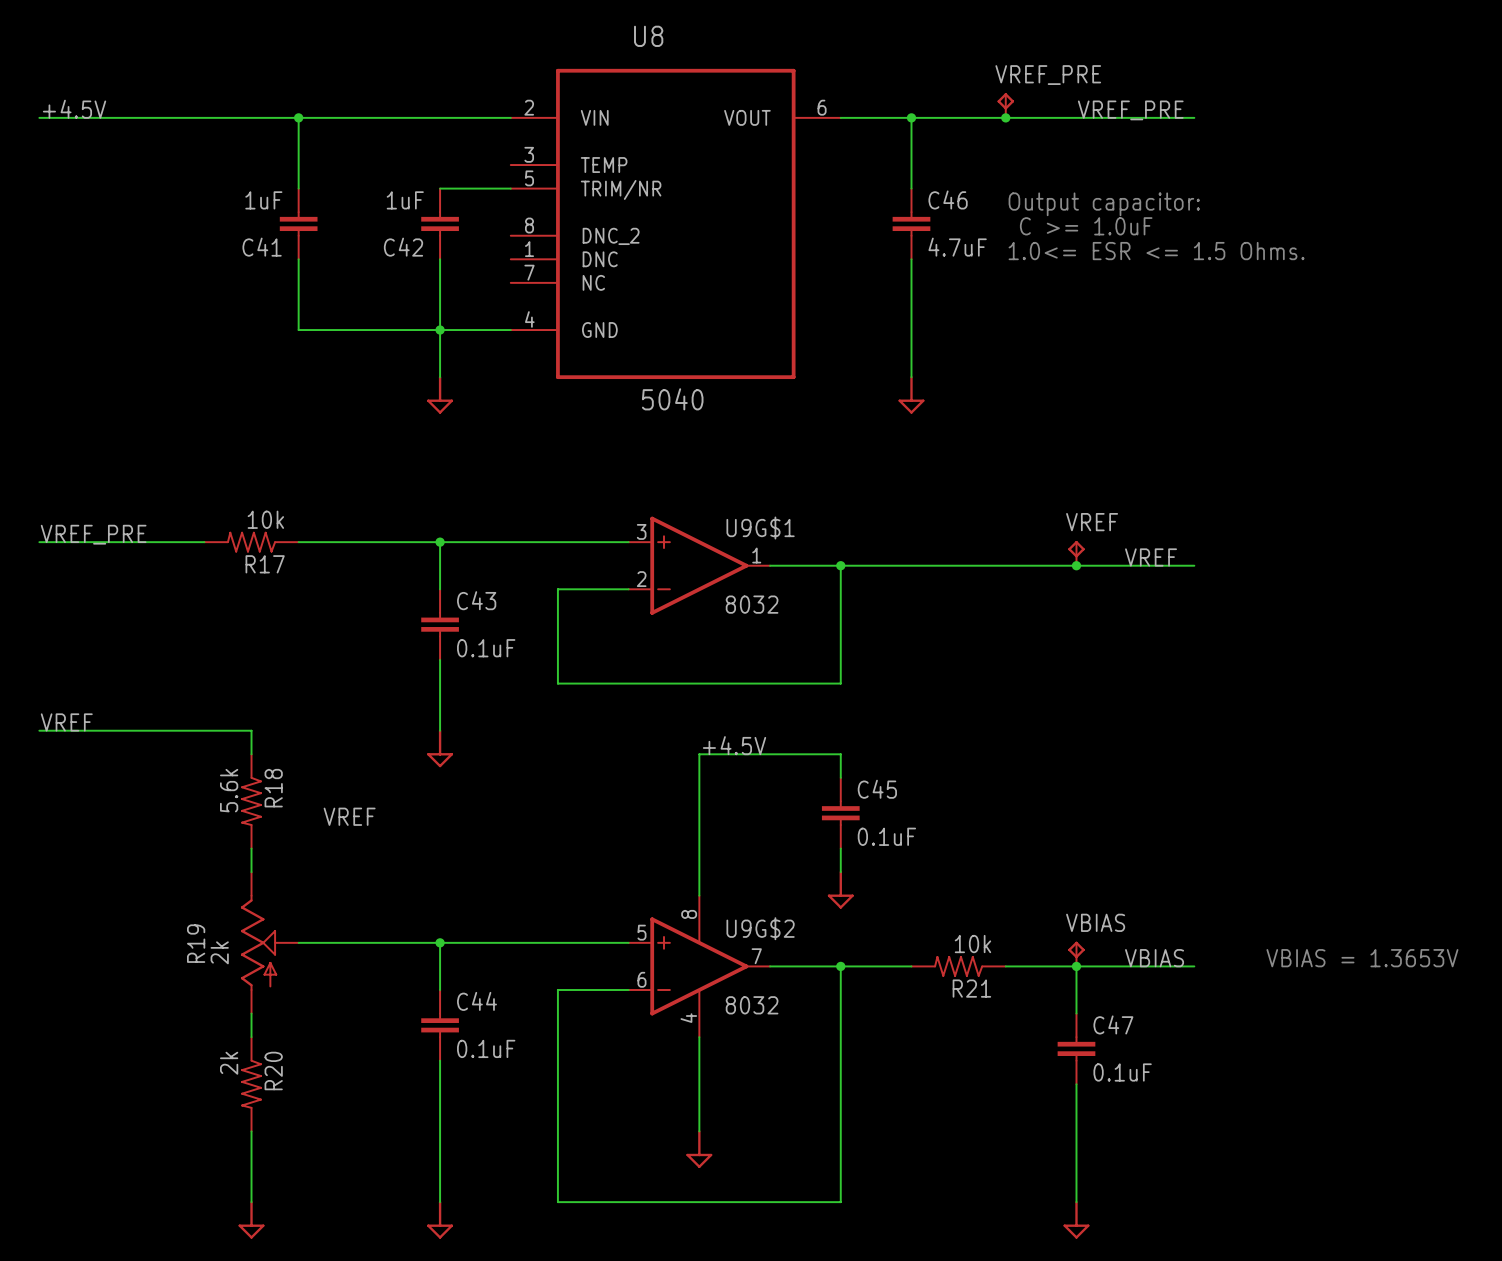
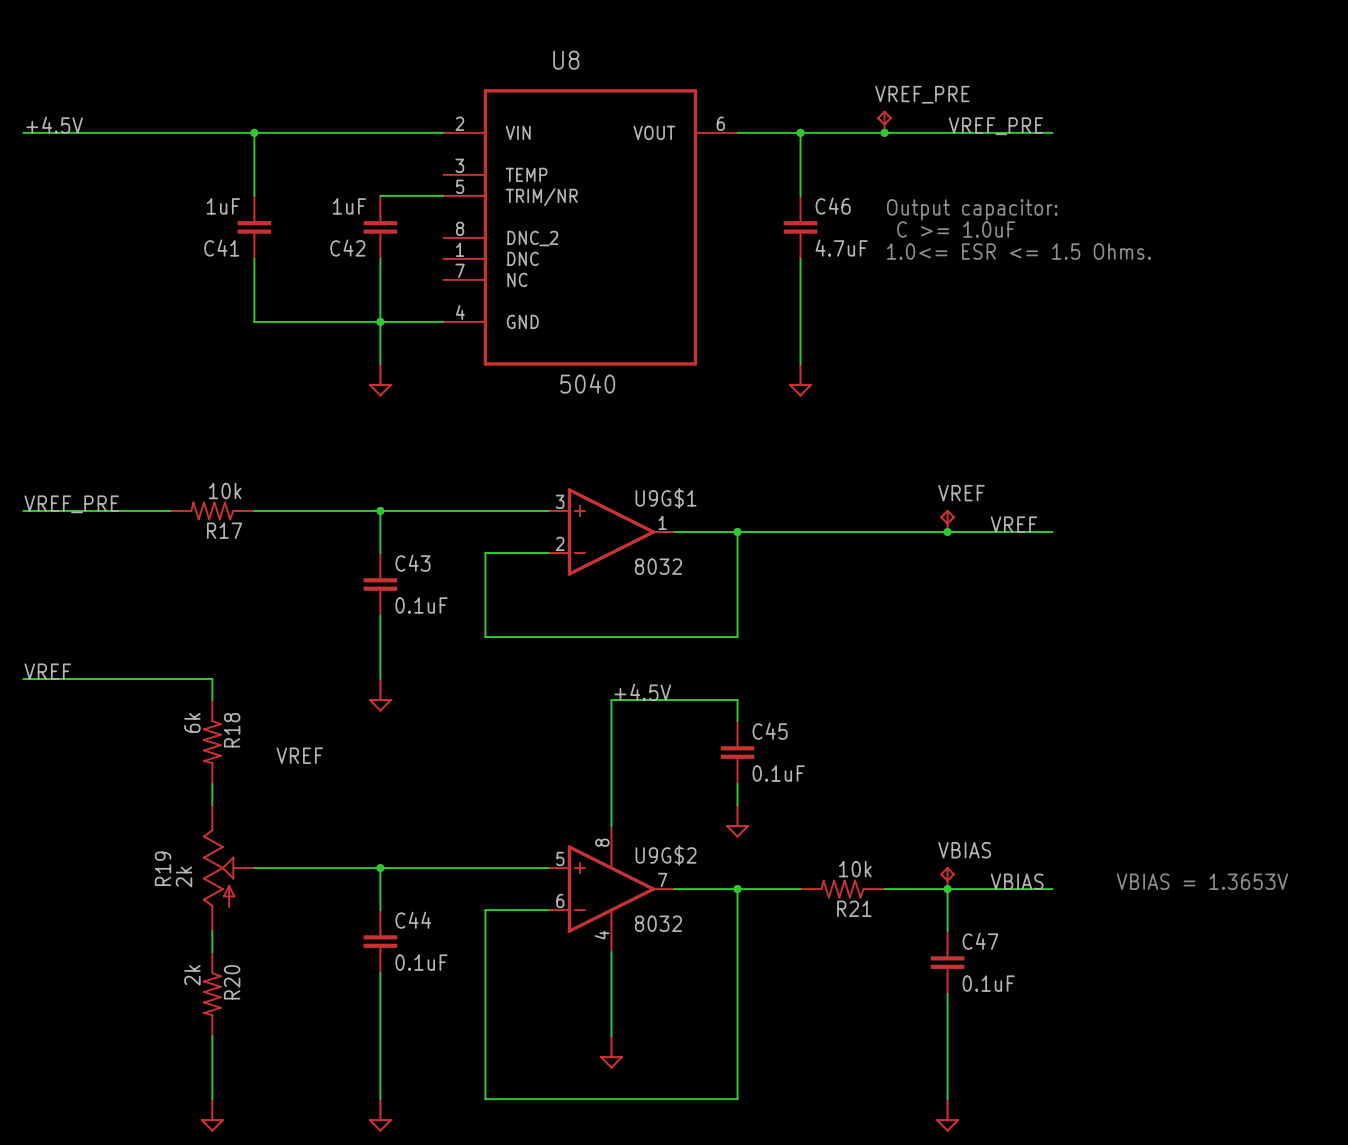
R18 value: 5.6k (229, 790) -> 6k (192, 722)

